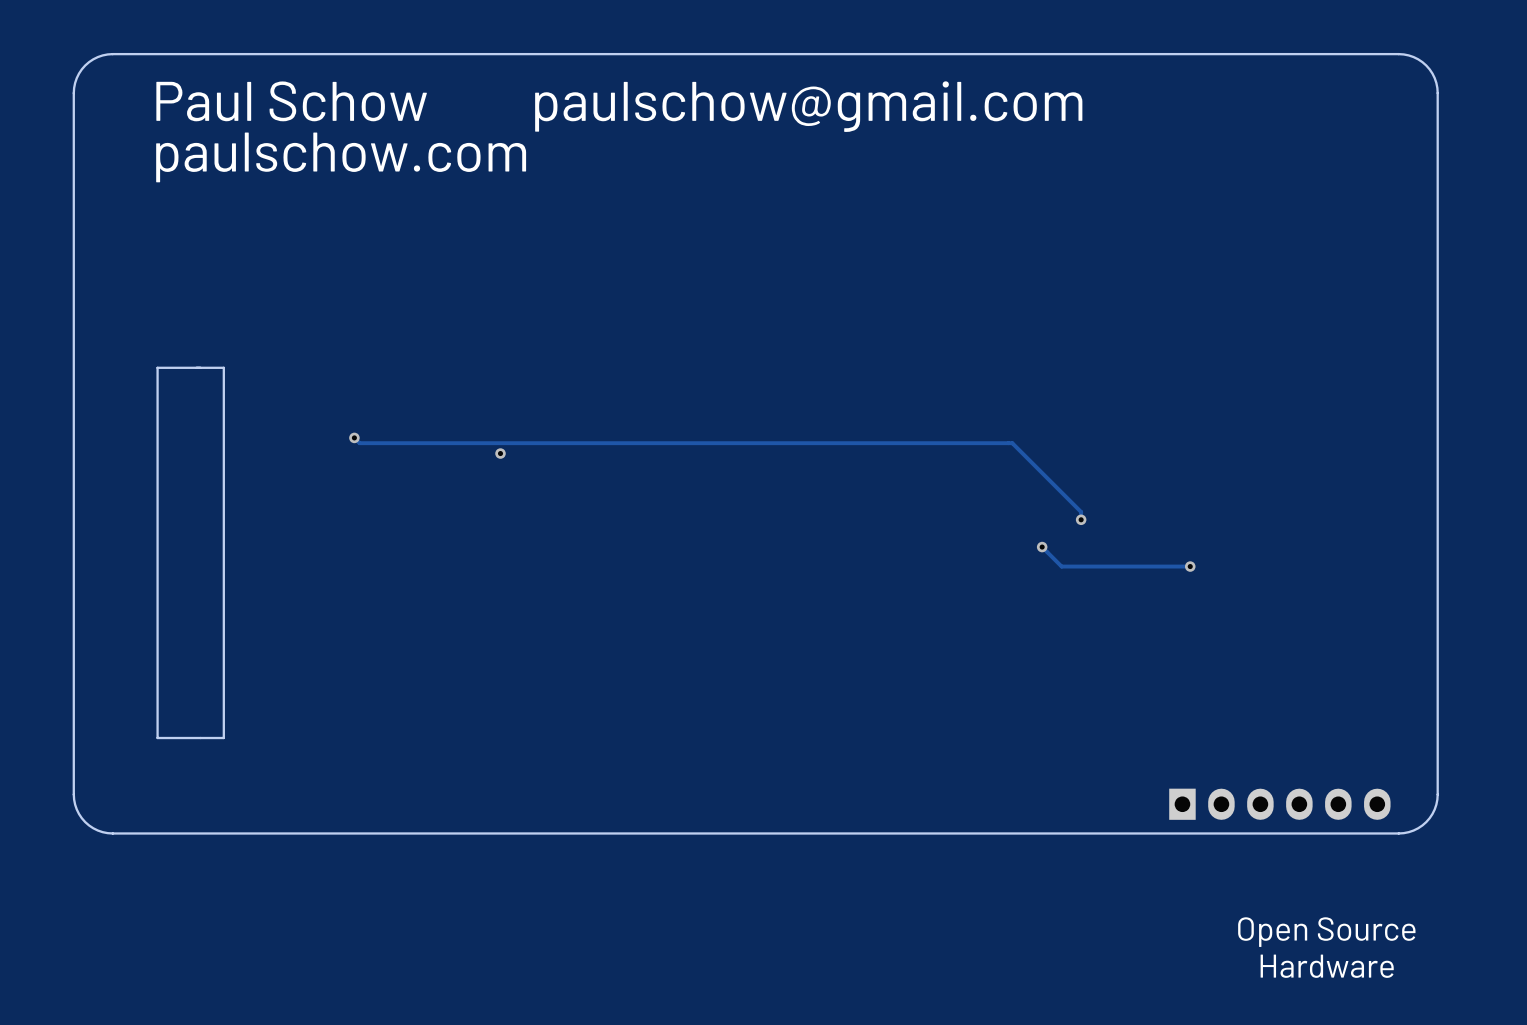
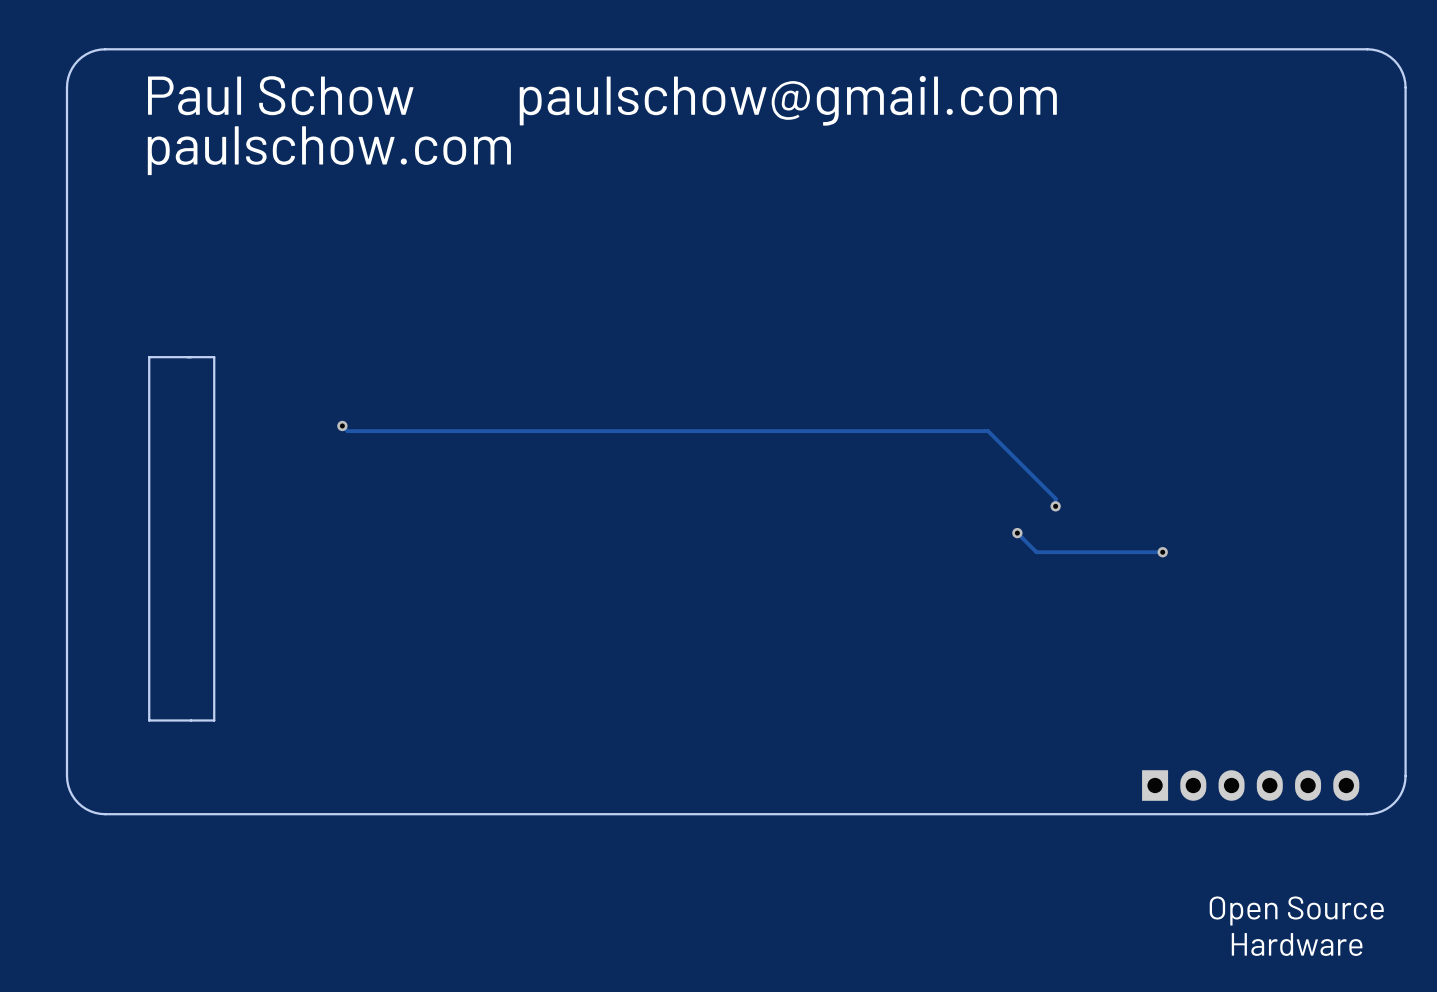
via: (500, 453) -> none

